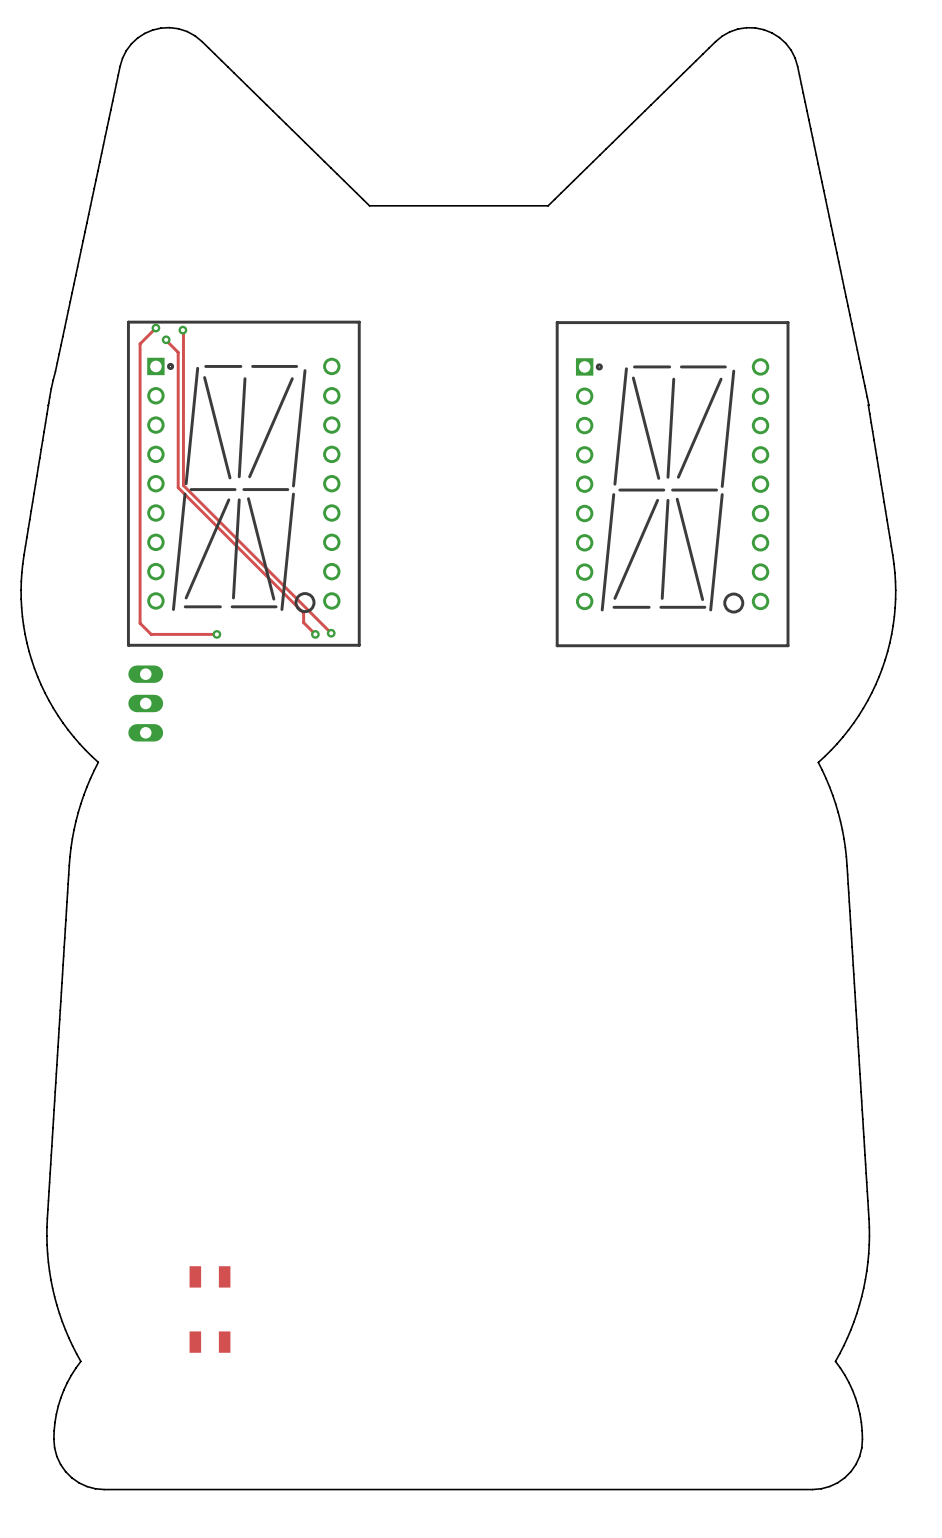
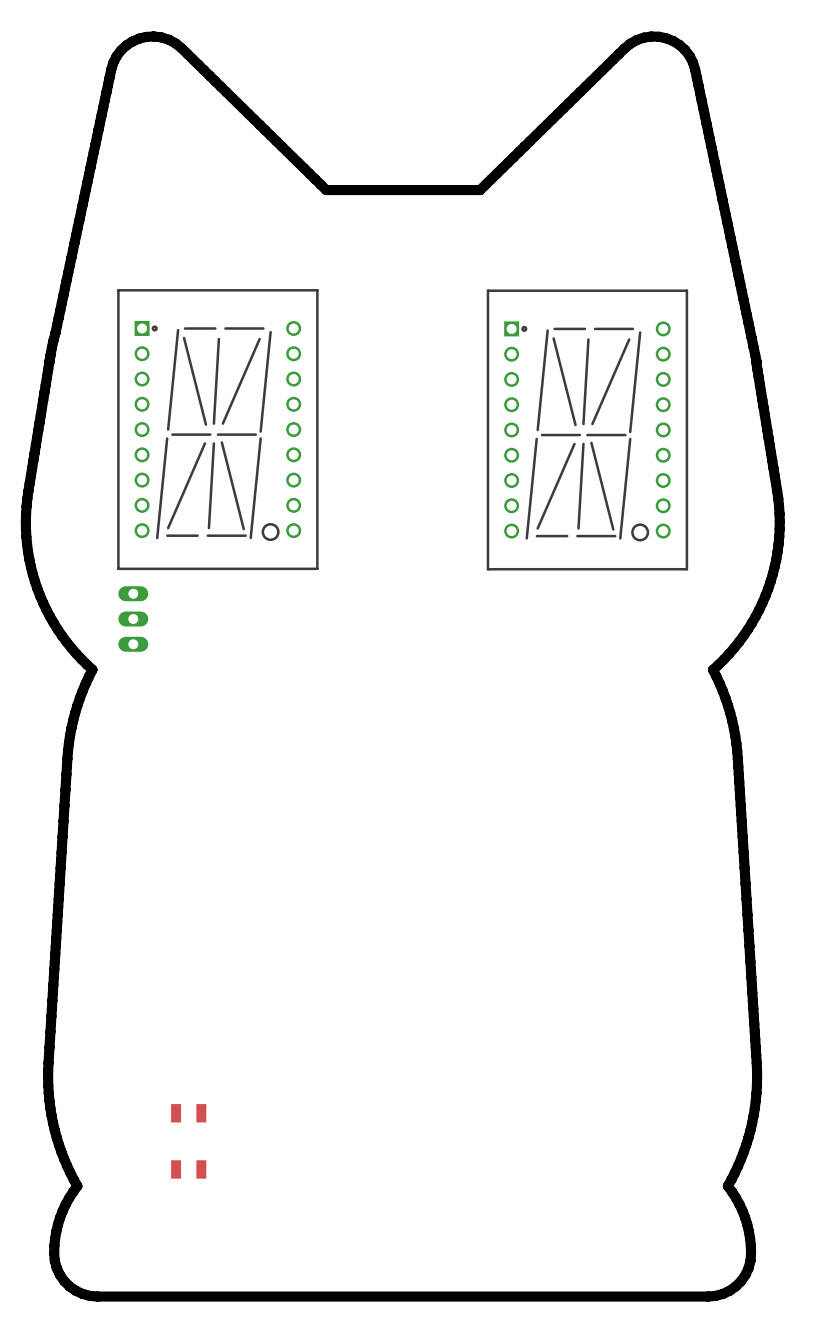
track: (155, 328) (140, 343) (140, 623) (151, 634) (216, 634) -> none
via: (155, 328) -> none
track: (182, 330) (183, 485) (331, 633) -> none
via: (182, 330) -> none
track: (166, 339) (178, 352) (178, 487) (303, 613) (303, 622) (315, 634) -> none
via: (166, 339) -> none
board edge width: thin (48, 405) (120, 66) (131, 43) (144, 33) (169, 27) (187, 31) (195, 35) (369, 205) (548, 205) (722, 36) (738, 29) (755, 27) (772, 32) (779, 37) (791, 50) (797, 66) (868, 405) (895, 581) (893, 625) (887, 651) (879, 676) (867, 700) (853, 723) (837, 743) (818, 762) (835, 803) (846, 856) (869, 1227) (867, 1262) (861, 1296) (850, 1329) (835, 1361) (848, 1382) (855, 1398) (862, 1430) (859, 1456) (856, 1464) (844, 1477) (829, 1486) (812, 1489) (104, 1489) (86, 1486) (79, 1482) (65, 1471) (60, 1464) (54, 1447) (54, 1422) (63, 1390) (80, 1361) (65, 1329) (54, 1296) (48, 1262) (47, 1218) (69, 856) (80, 803) (98, 762) (68, 730) (48, 700) (31, 659) (23, 625) (21, 599) (22, 563) (48, 405) -> thick (49, 362) (111, 69) (120, 50) (132, 41) (153, 36) (175, 43) (326, 190) (480, 190) (630, 43) (643, 37) (658, 36) (679, 45) (689, 55) (695, 69) (756, 362) (779, 513) (777, 551) (765, 595) (743, 635) (713, 669) (727, 705) (737, 751) (757, 1070) (755, 1100) (750, 1130) (741, 1159) (727, 1186) (745, 1217) (750, 1245) (748, 1267) (735, 1286) (722, 1293) (708, 1296) (97, 1296) (75, 1290) (64, 1281) (54, 1260) (55, 1238) (62, 1210) (77, 1186) (64, 1159) (54, 1130) (49, 1100) (48, 1063) (68, 751) (77, 705) (92, 669) (66, 641) (49, 616) (34, 581) (28, 551) (25, 529) (27, 498) (49, 362)
via: (331, 633) -> none
via: (216, 634) -> none
via: (315, 634) -> none

